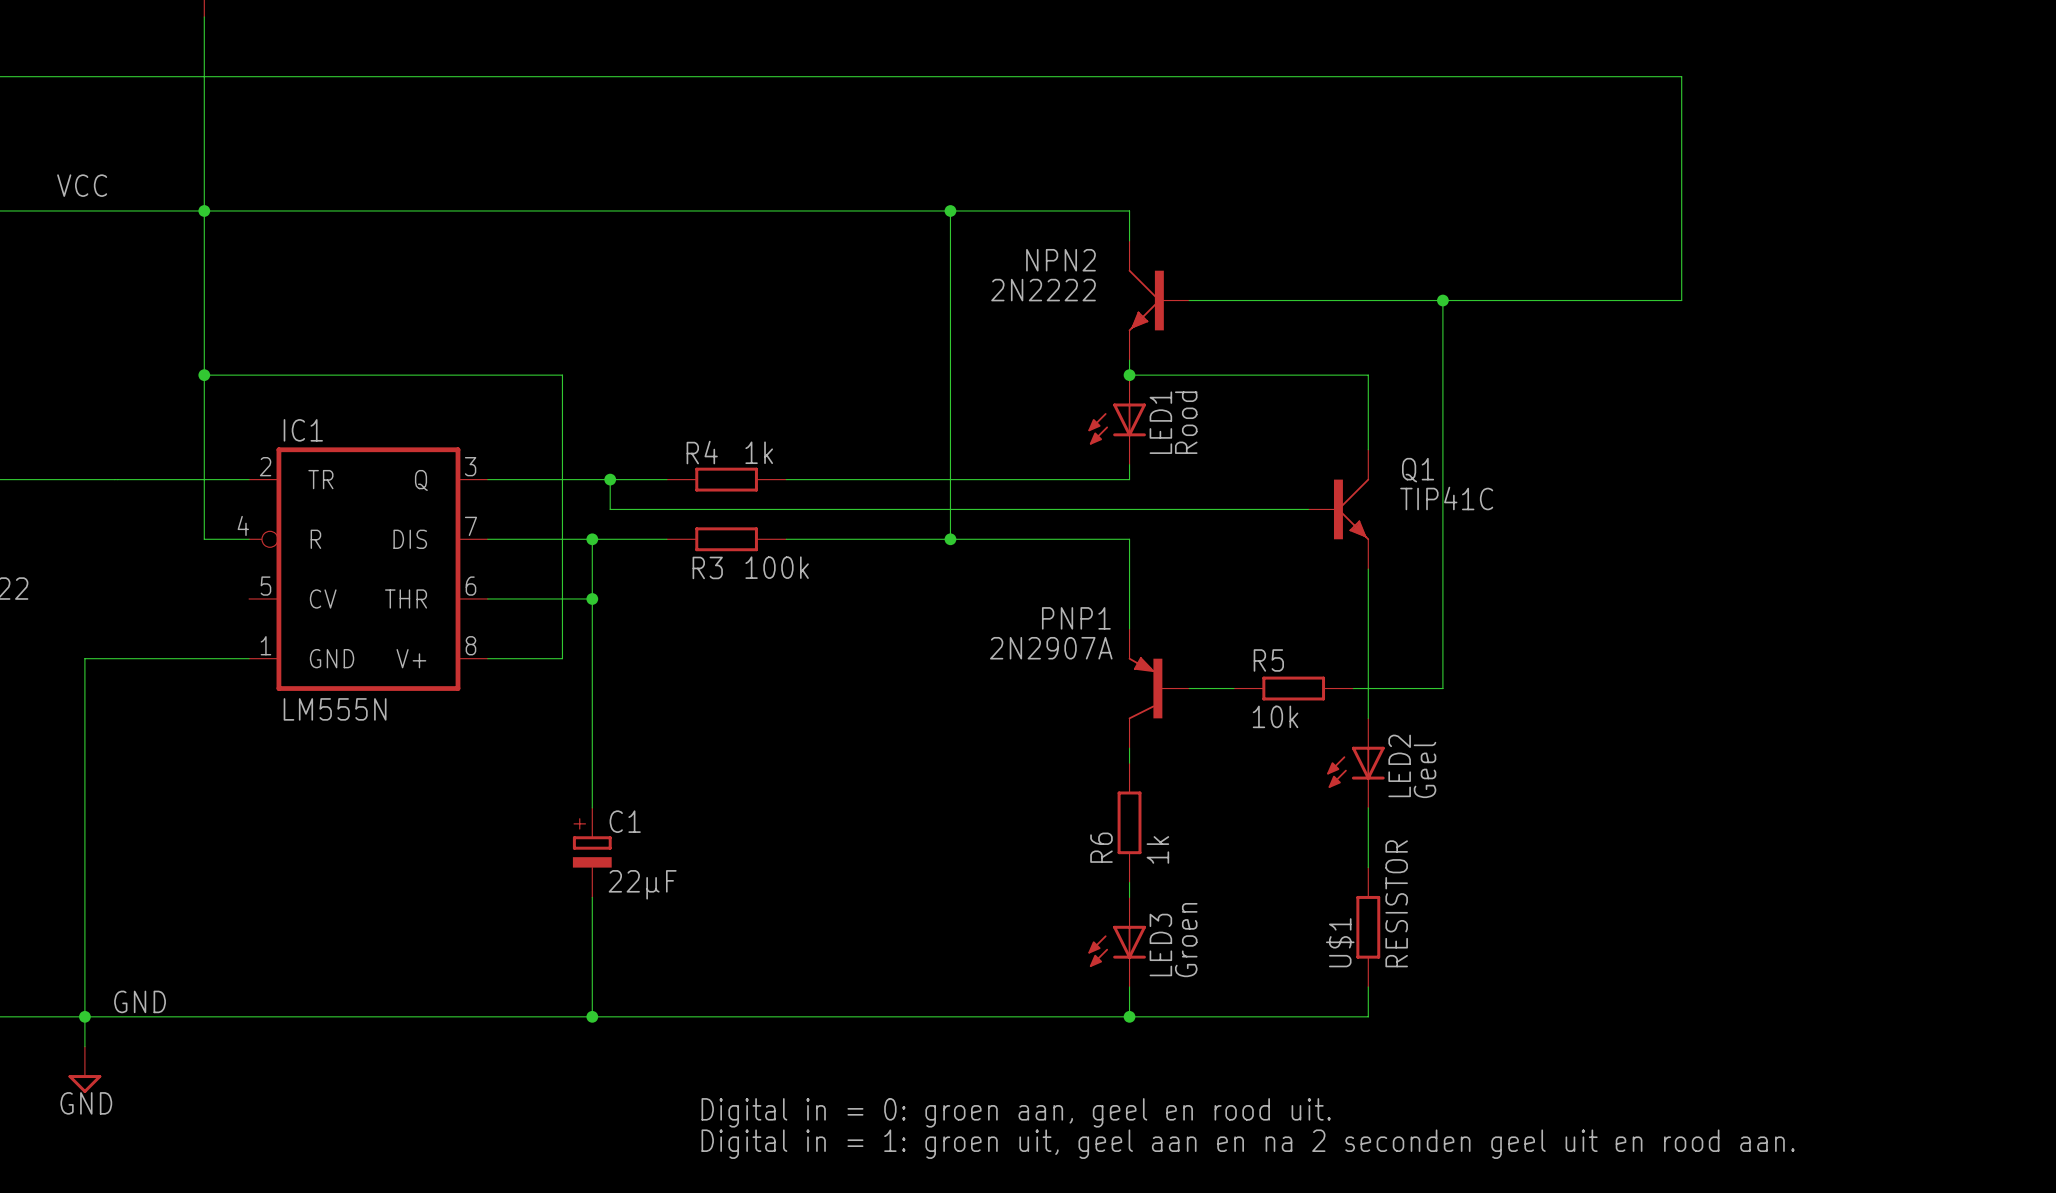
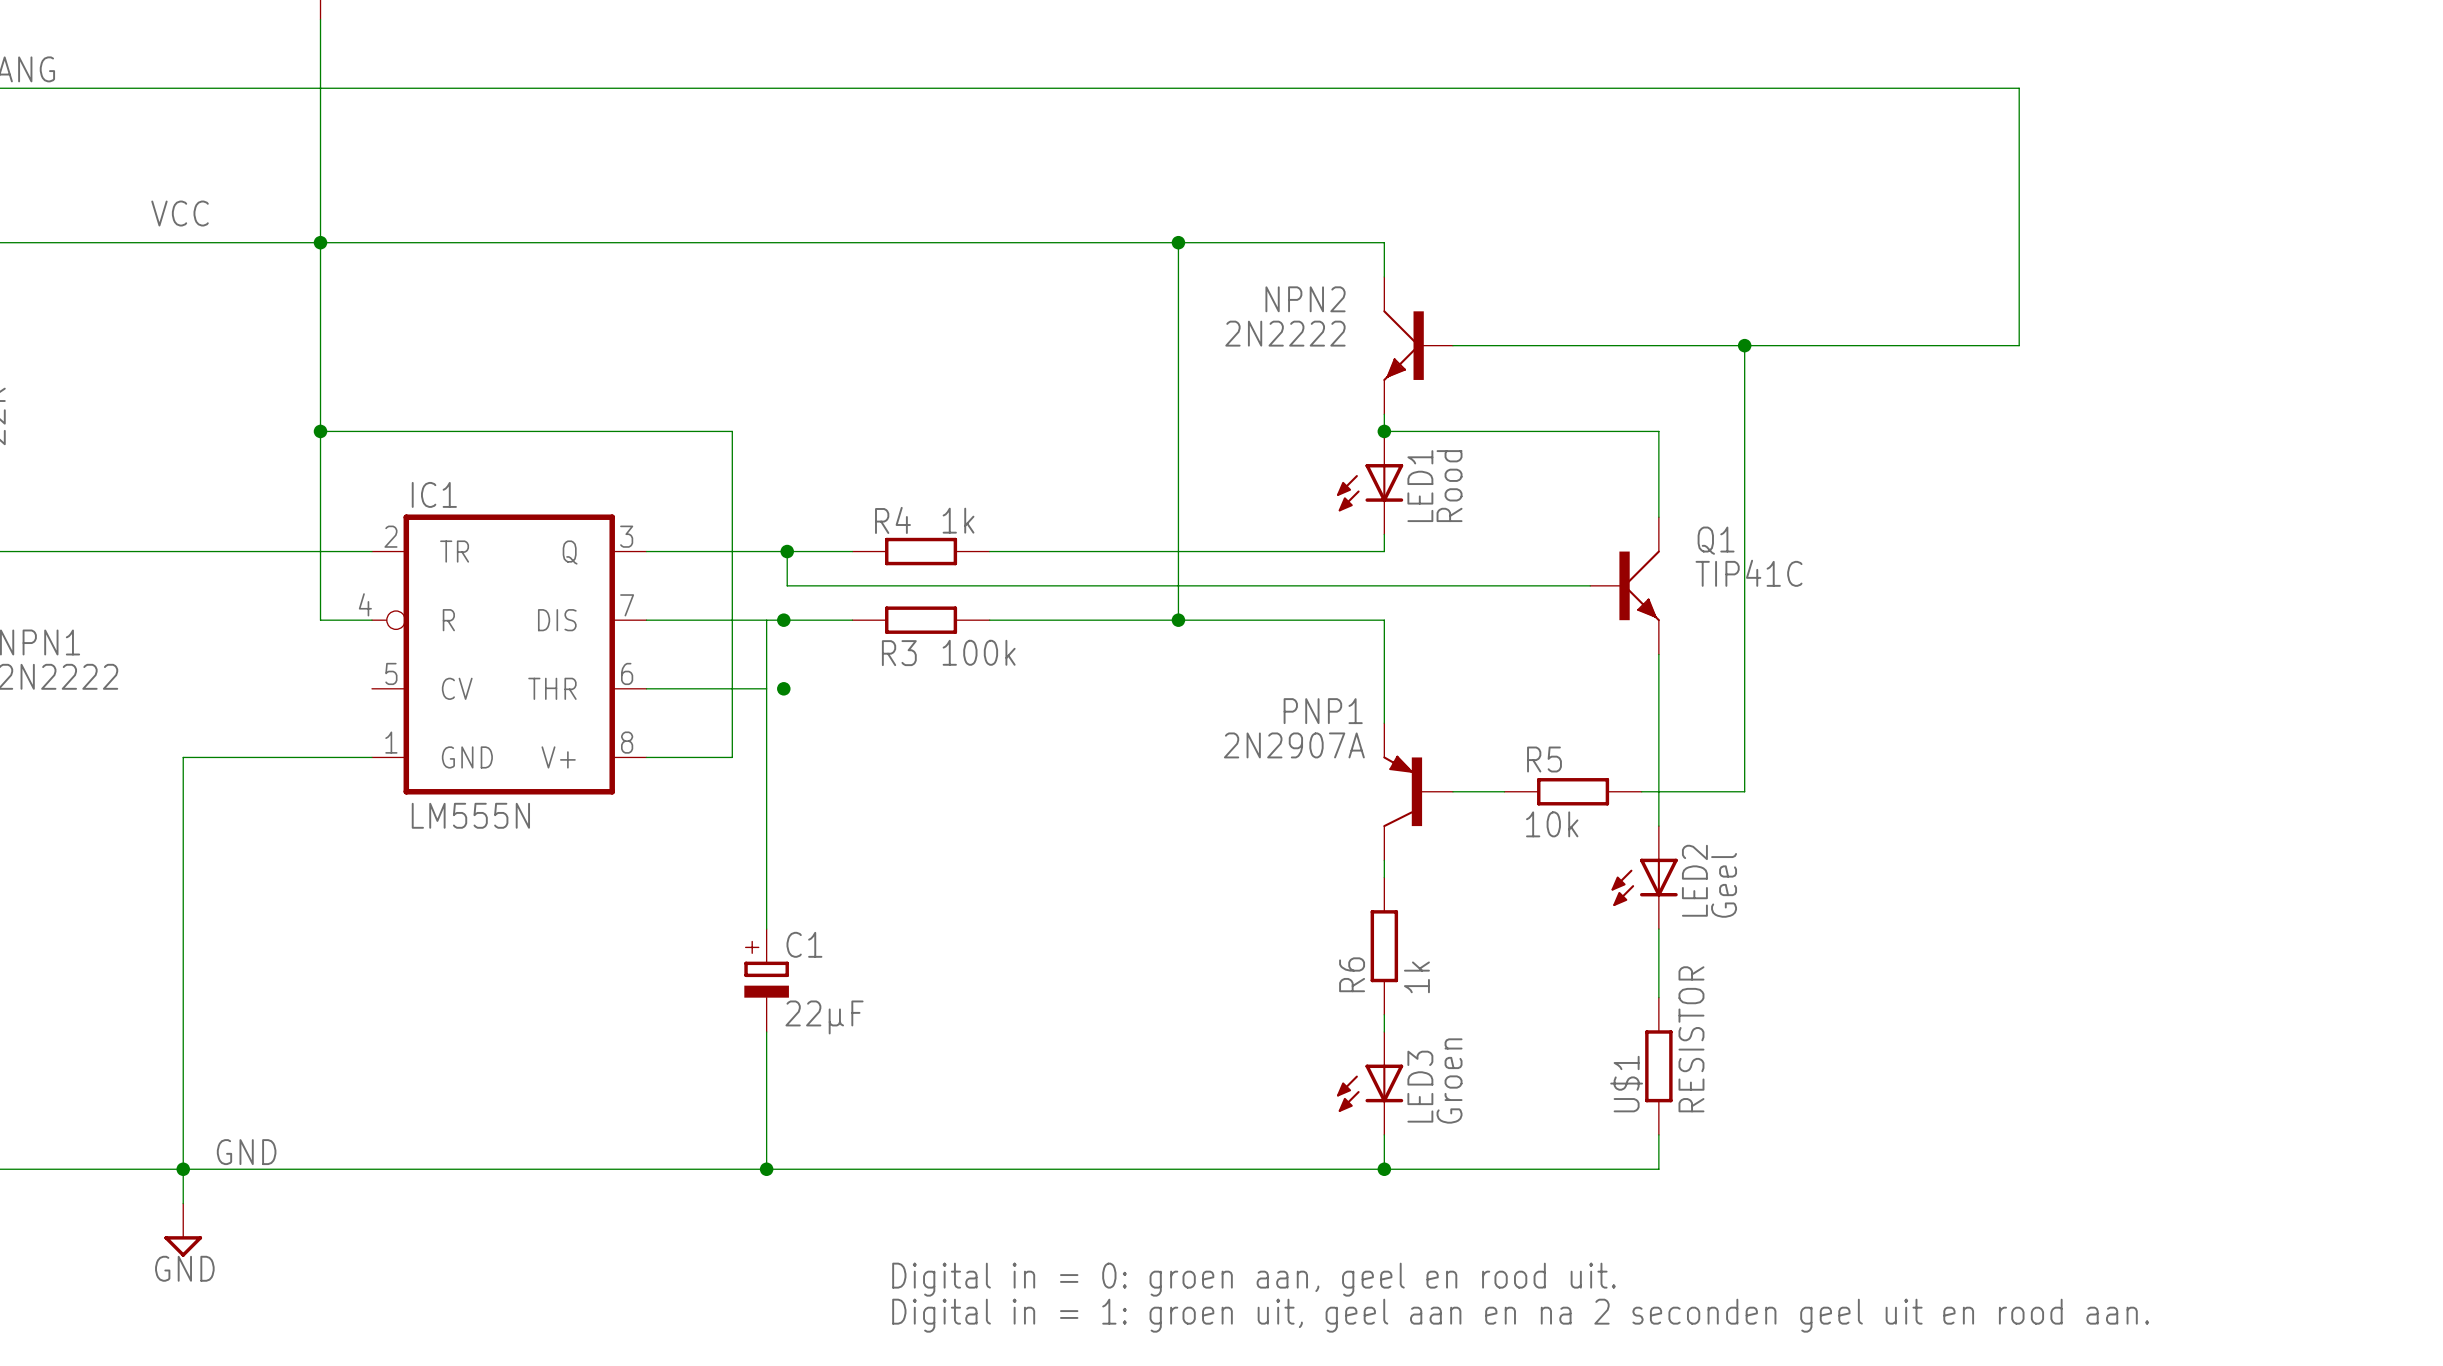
junction position: (592, 539) -> (783, 620)
junction position: (592, 598) -> (783, 688)

